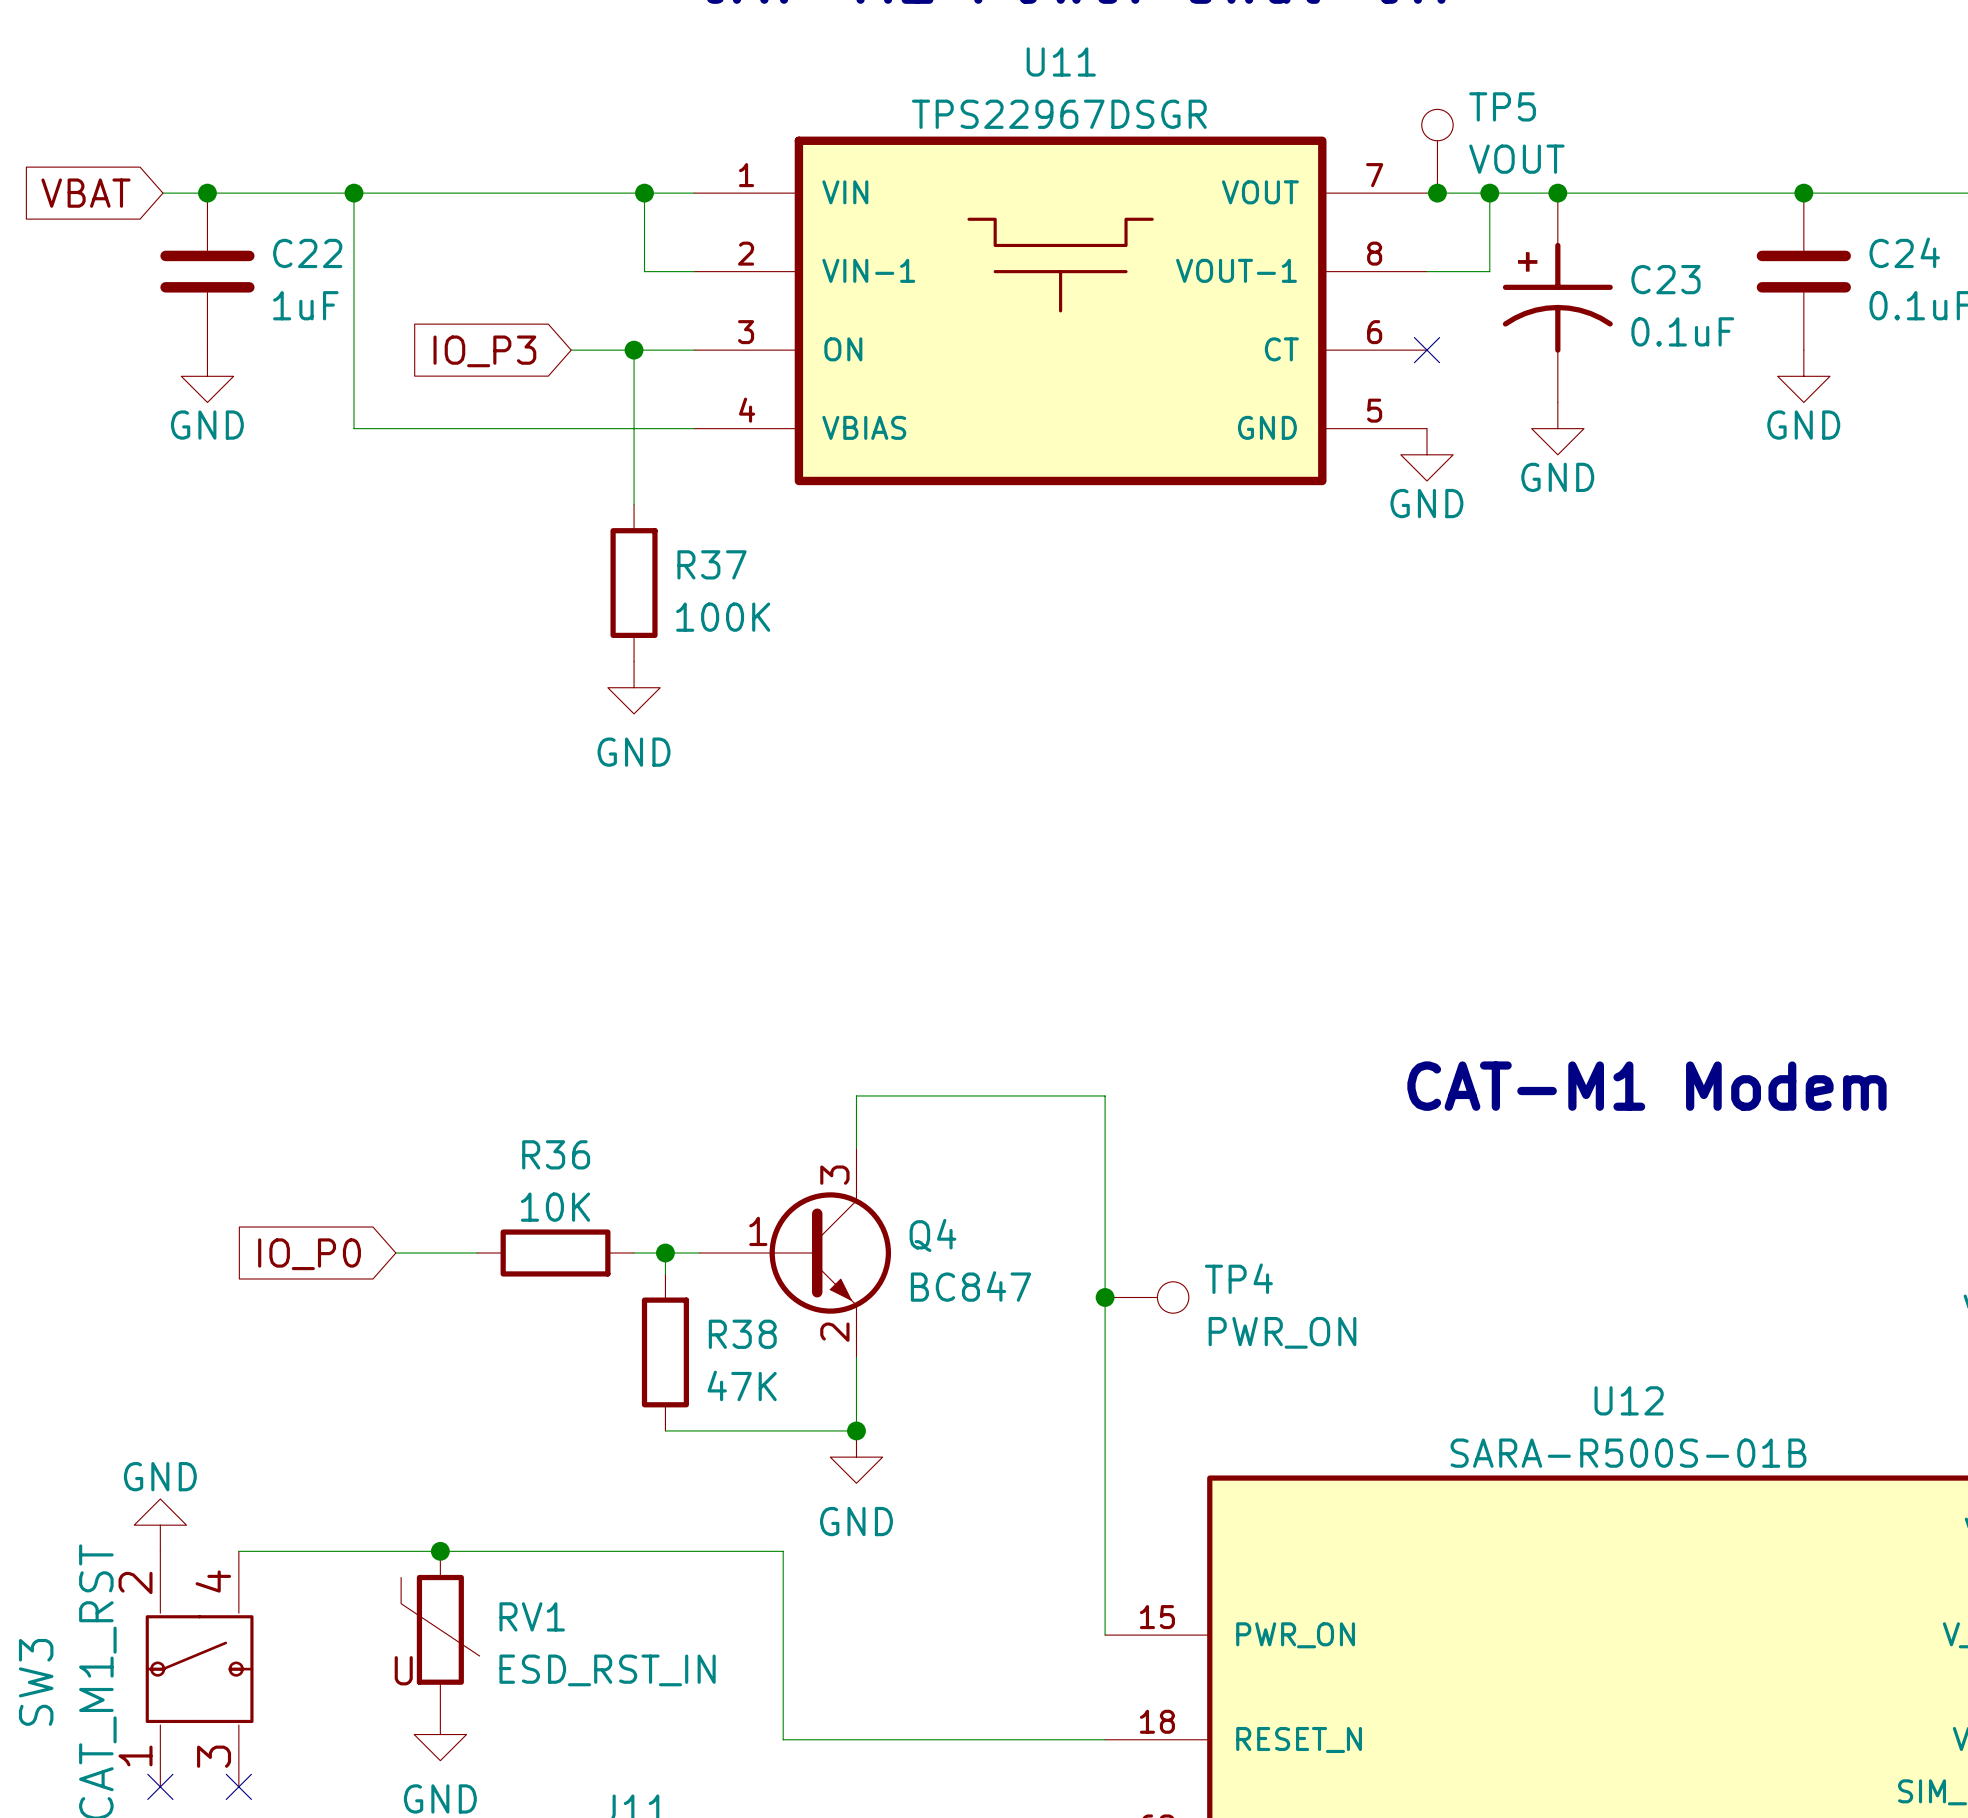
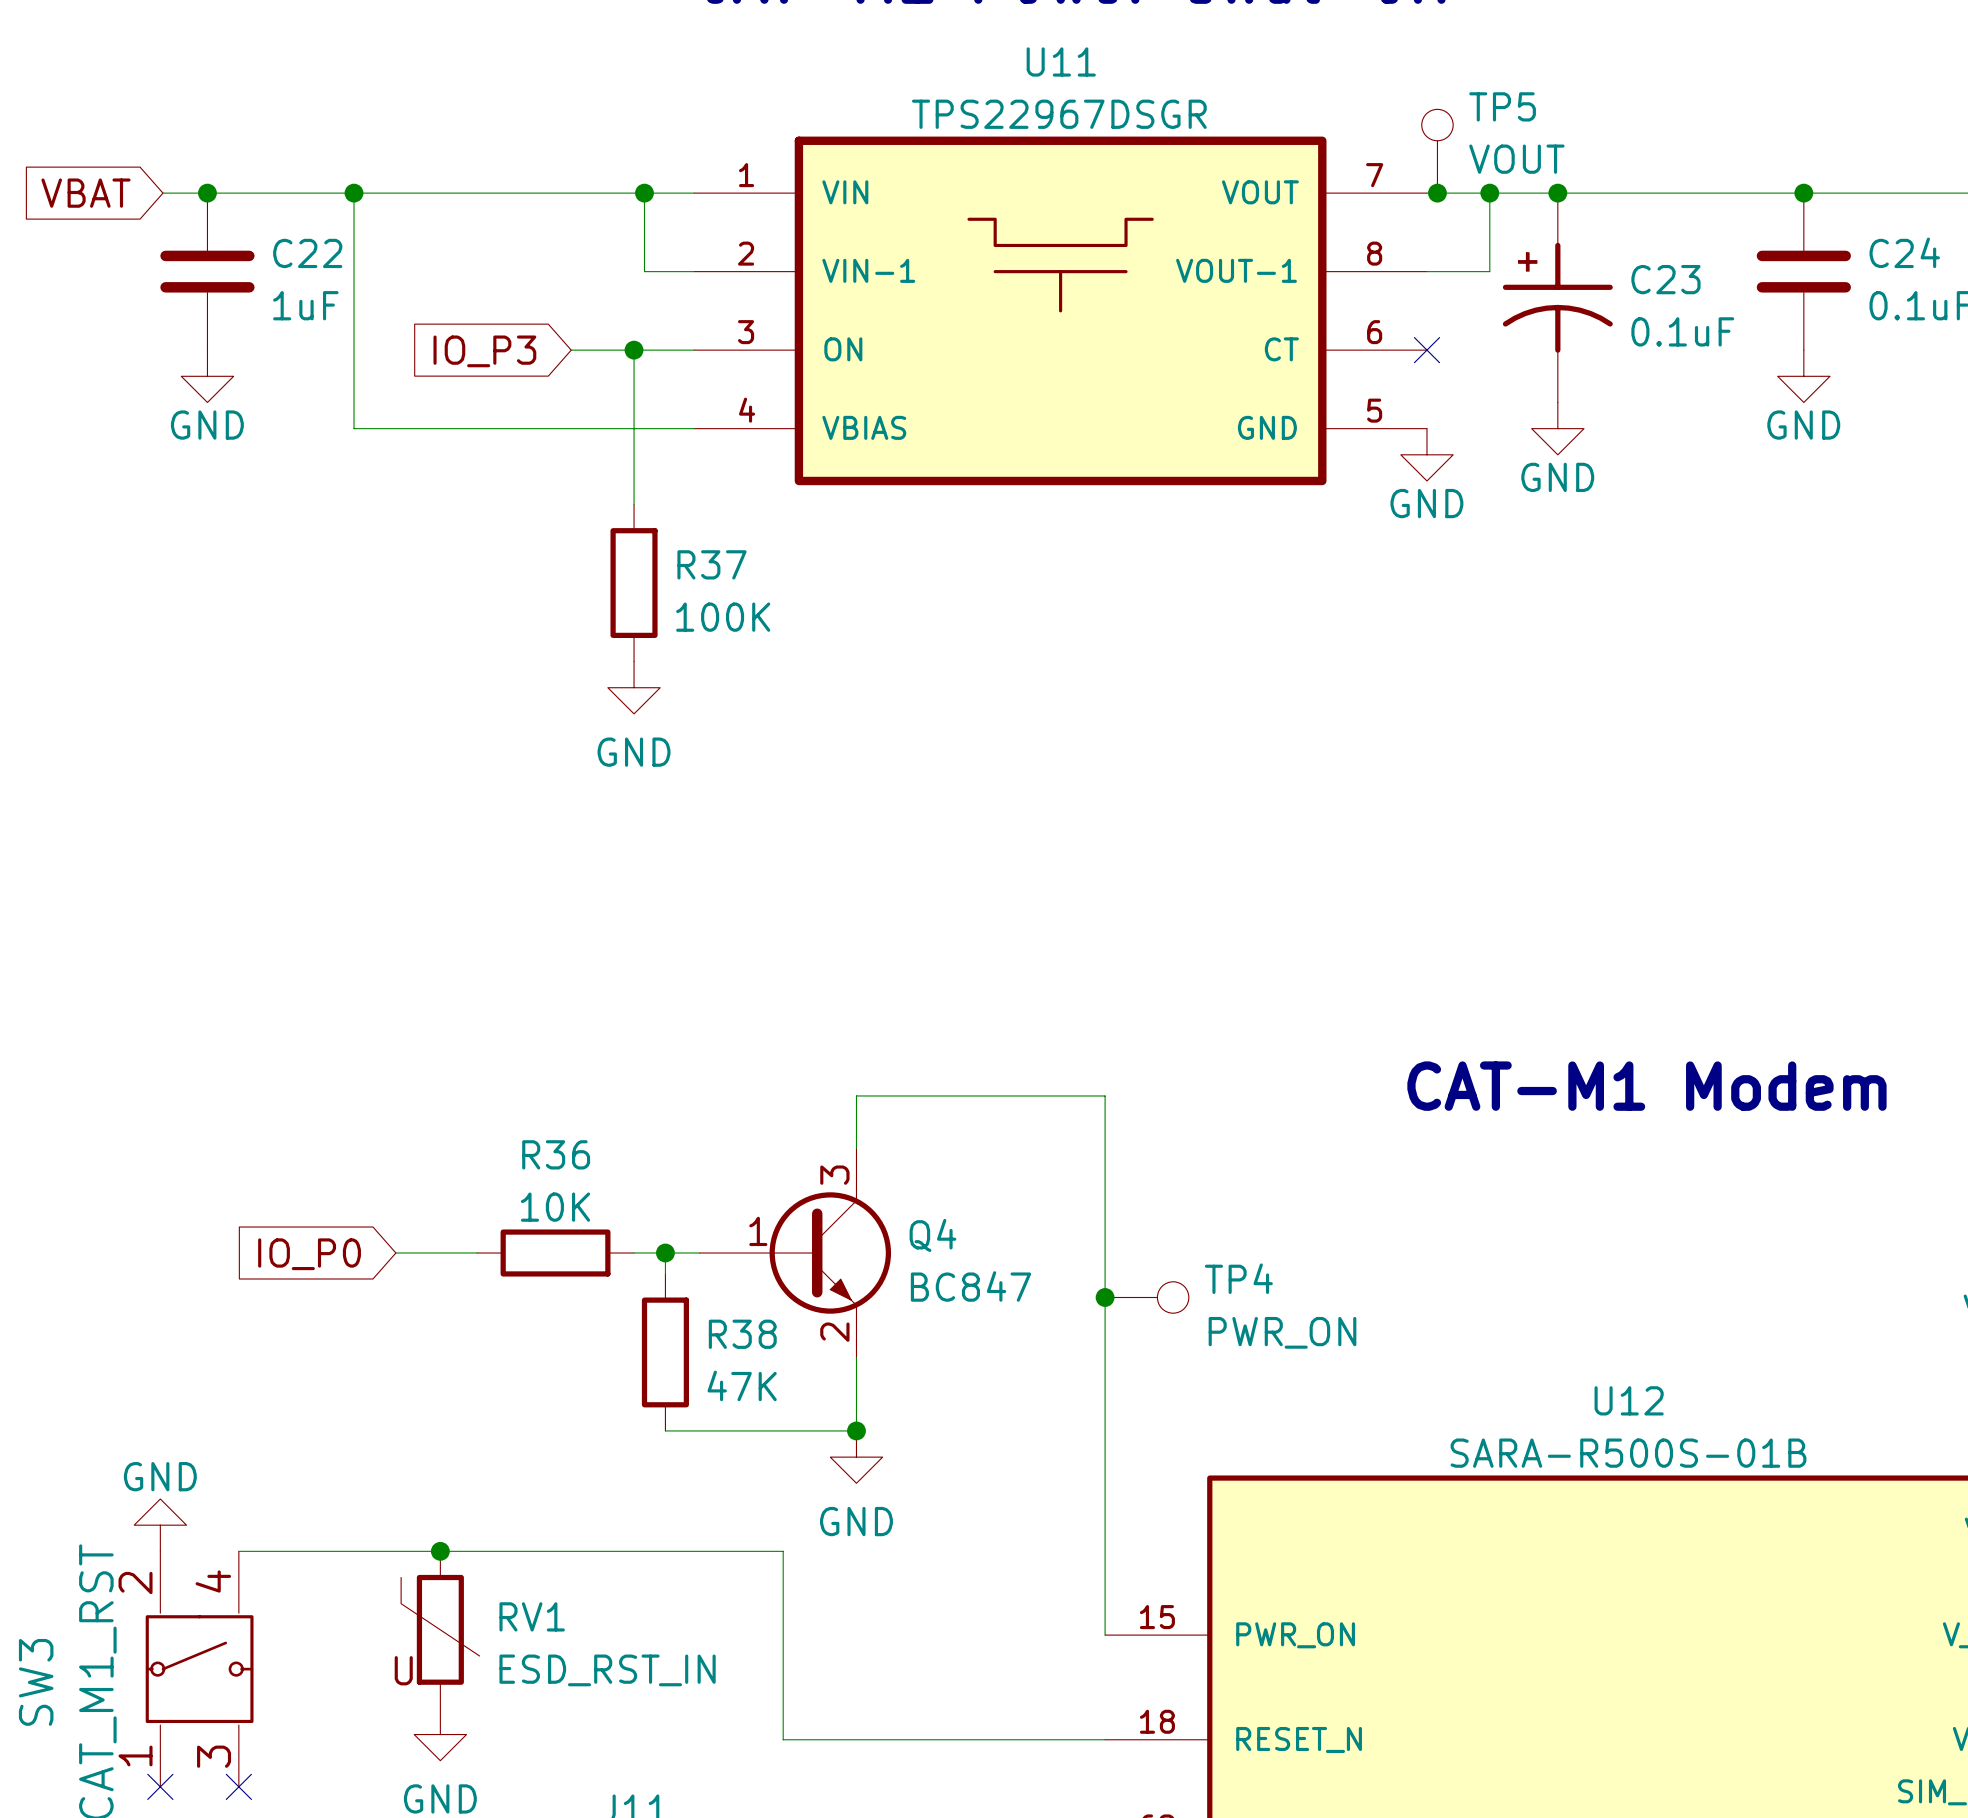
SW3 symbol: [145, 1551, 254, 1787] -> [145, 1551, 254, 1787]

